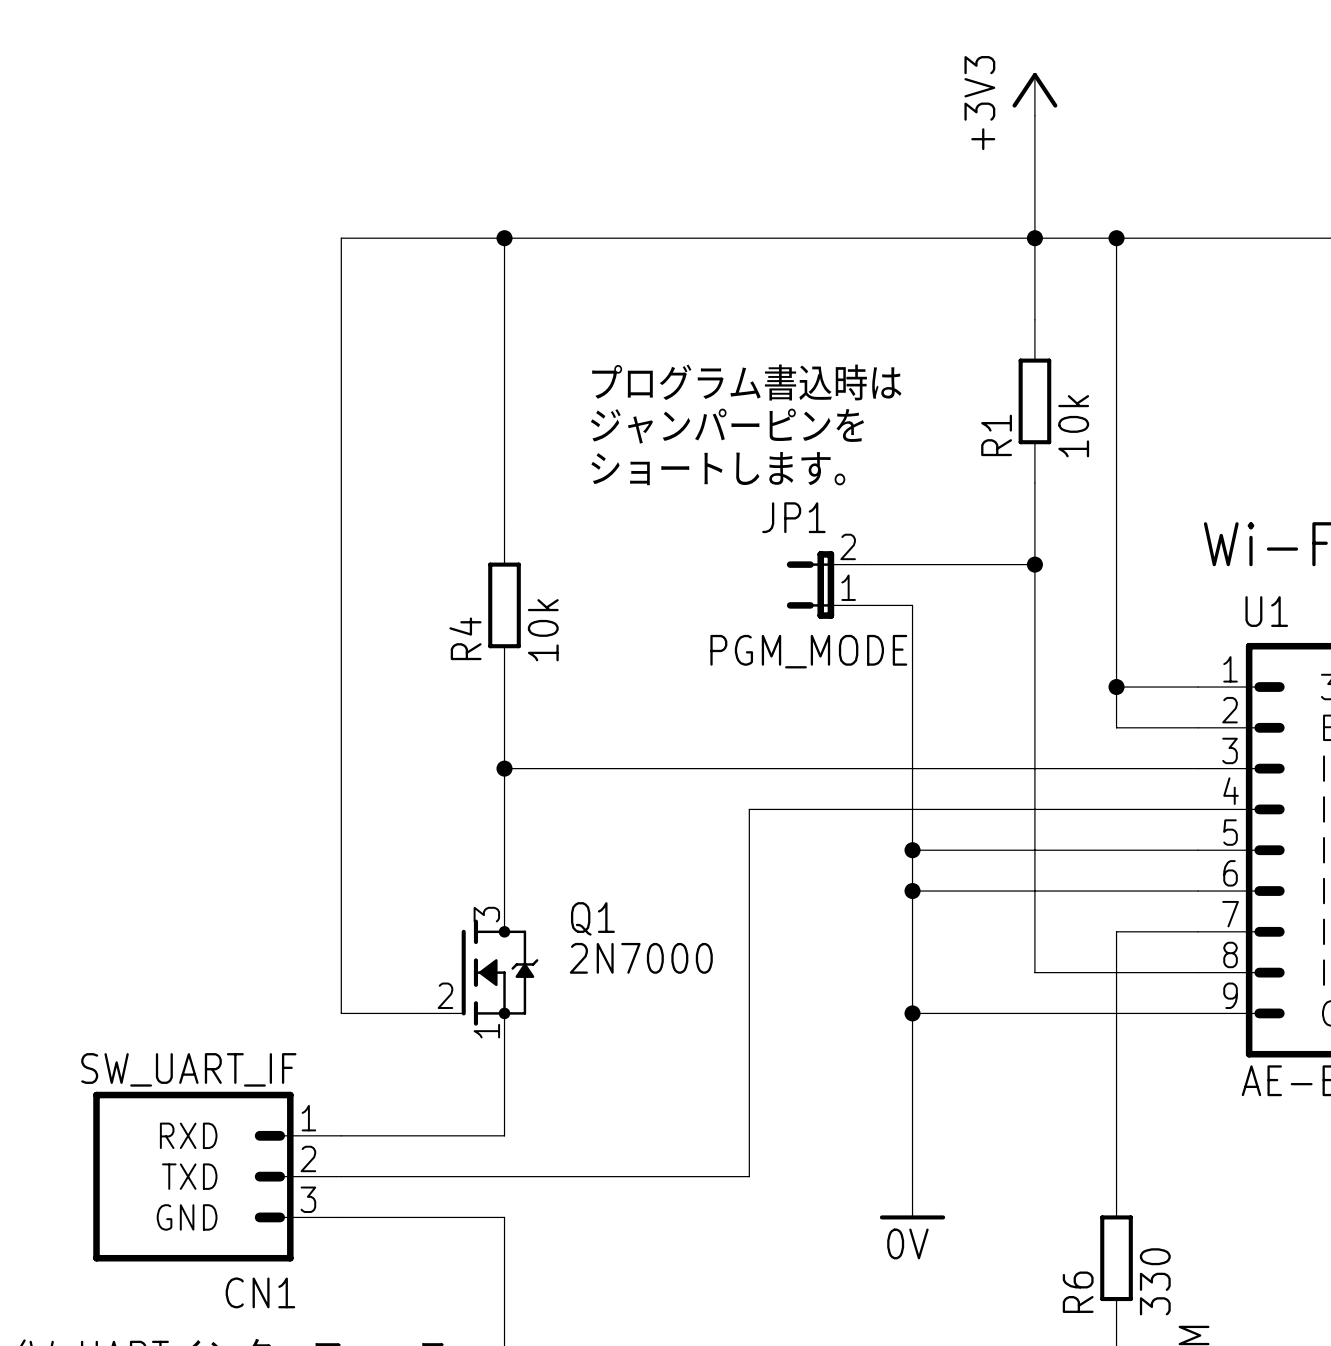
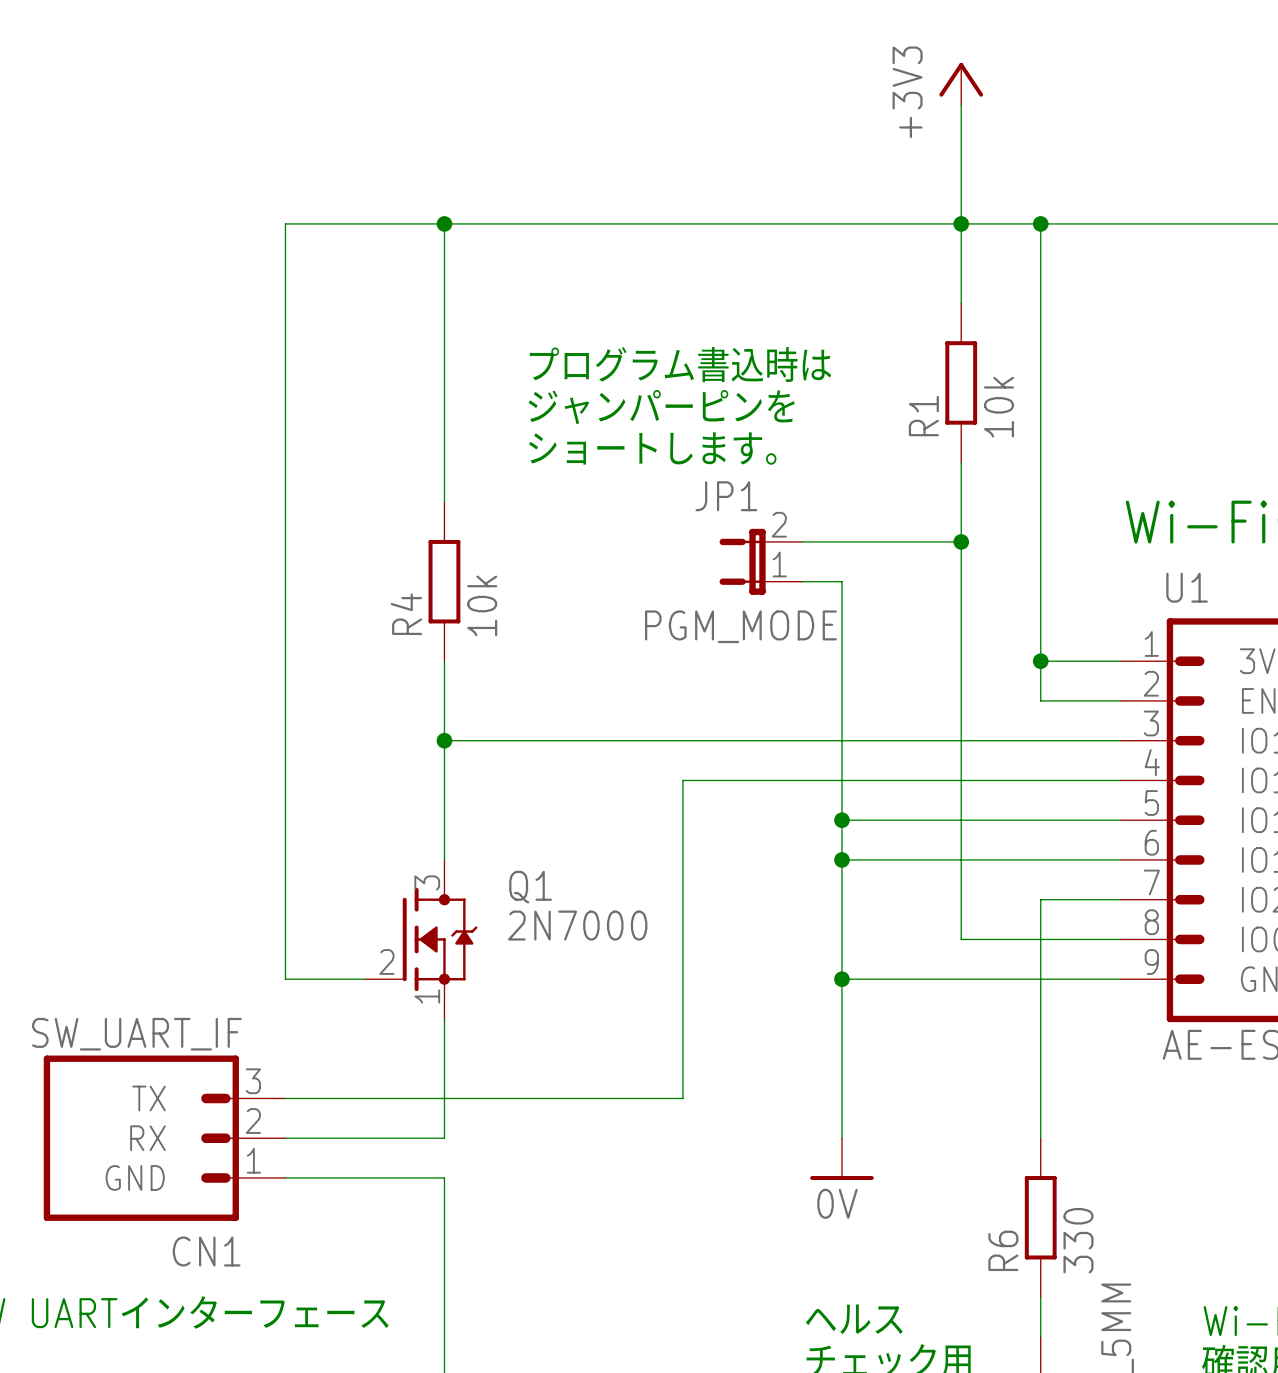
CN1 pin number: 1 (308, 1118) -> 3 (253, 1081)
CN1 pin name: RXD (188, 1135) -> TX (149, 1098)
wire: (749, 1135) (749, 1176) (504, 1176) -> (682, 1098) (444, 1098) (444, 1138)
CN1 pin name: TXD (189, 1176) -> RX (147, 1138)
CN1 pin number: 3 (308, 1199) -> 1 (253, 1160)

